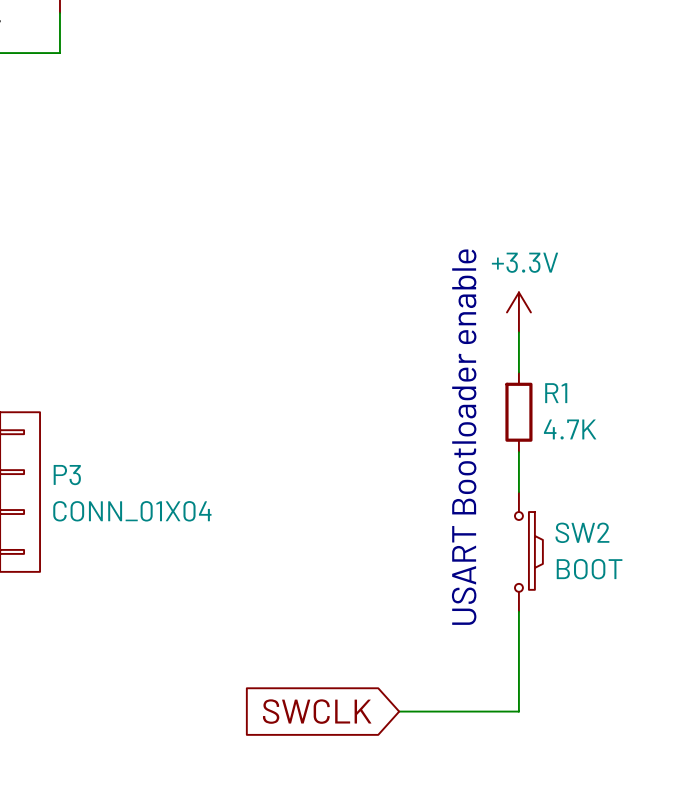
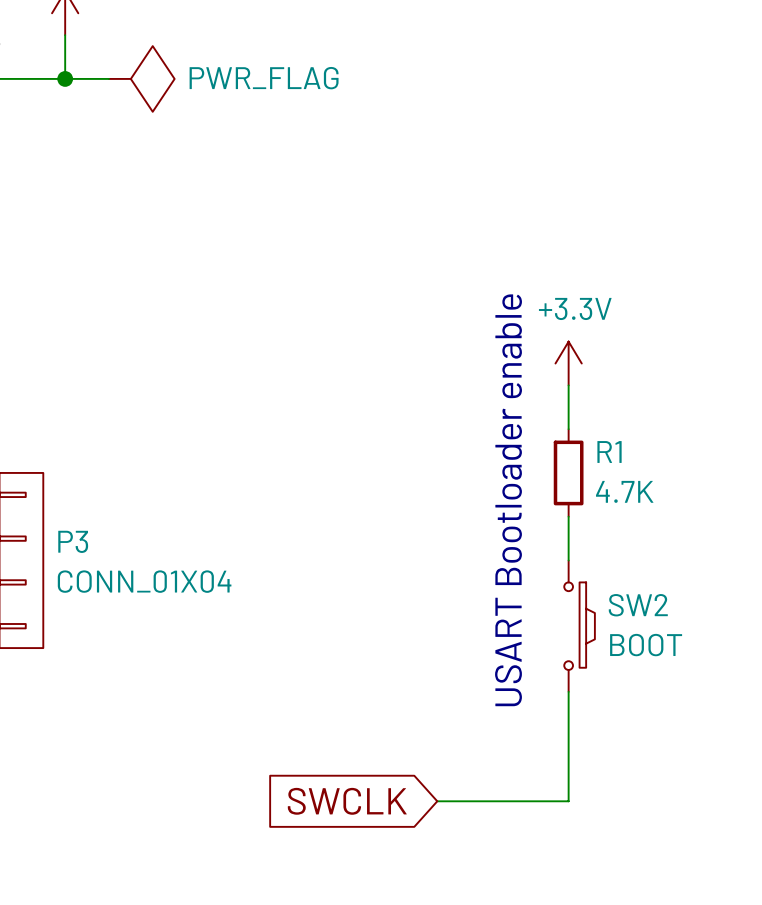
wire: none -> (65, 78) (108, 78)
junction: none -> (65, 78)
power symbol: none -> PWR_FLAG (141, 78)

